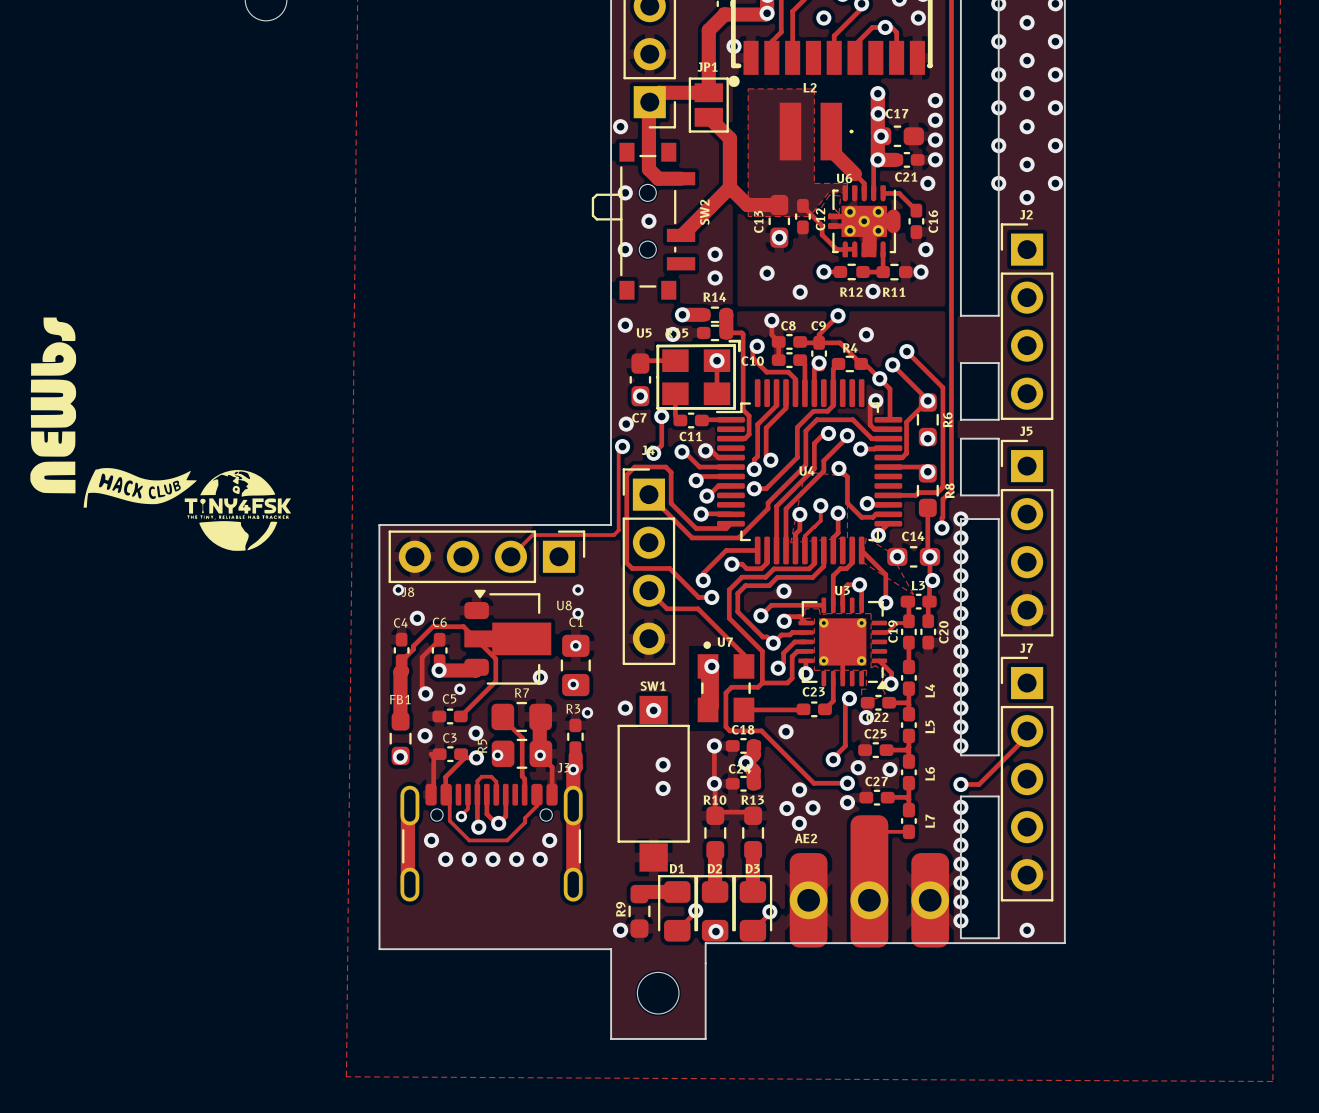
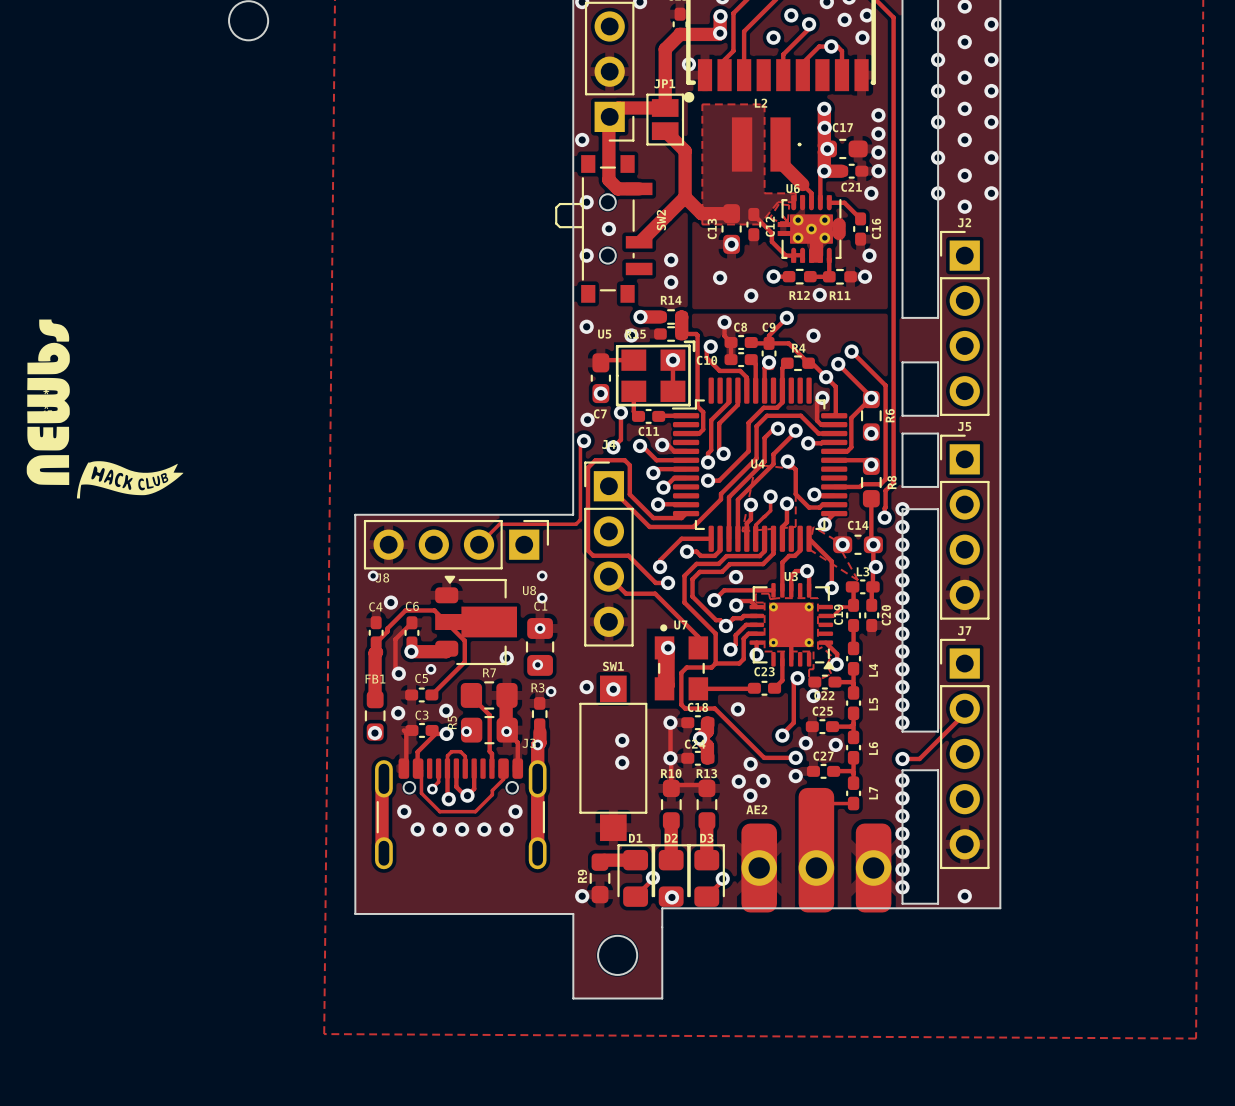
drawing: [30, 317, 77, 494] -> none
part: none -> (48, 402)
drawing: [184, 470, 292, 551] -> none

